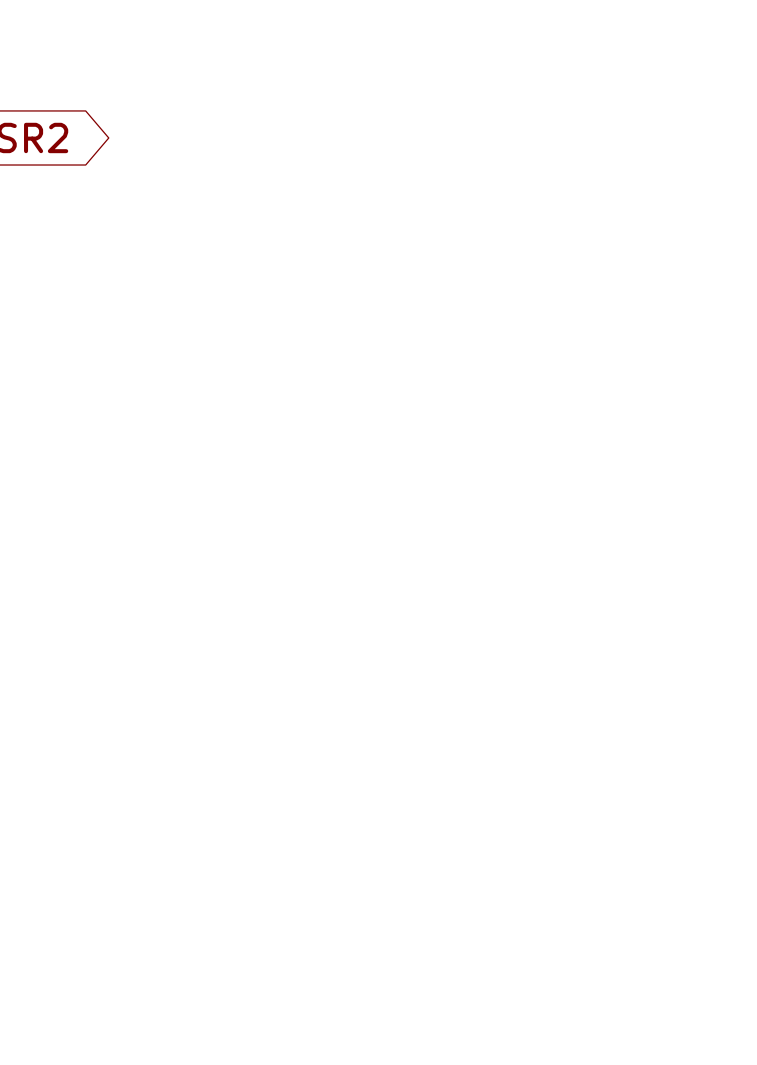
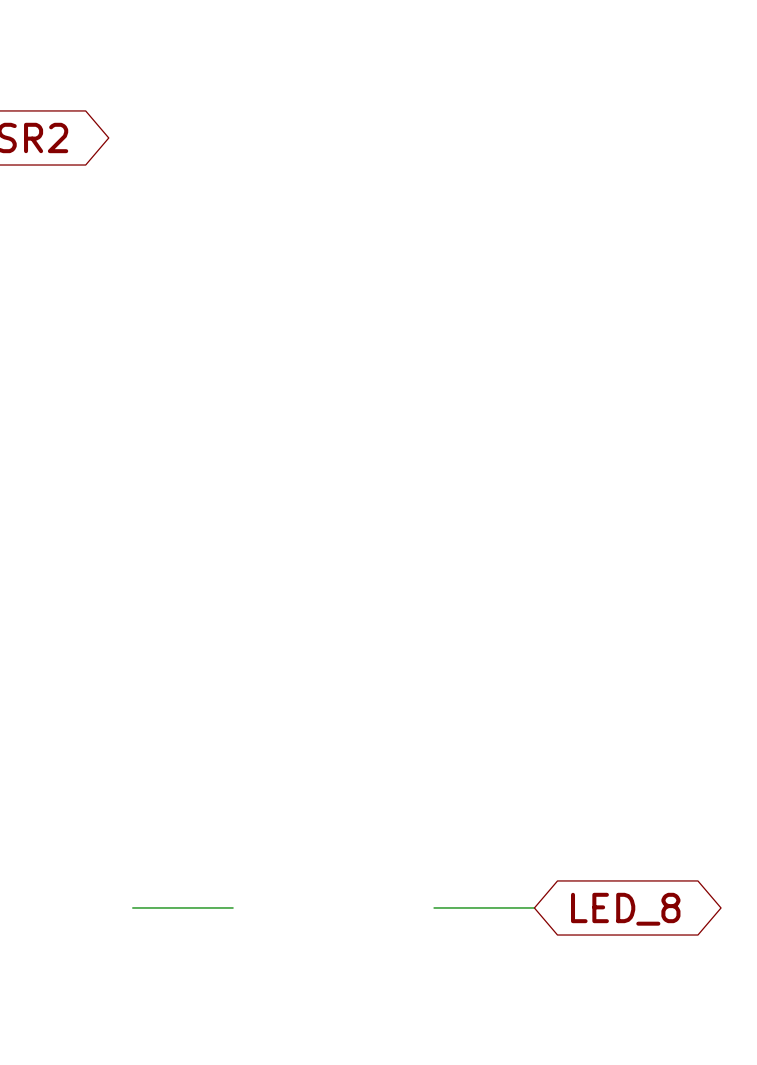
wire: none -> (132, 907) (233, 907)
wire: none -> (434, 907) (534, 907)
global label: none -> LED_8 (625, 909)

